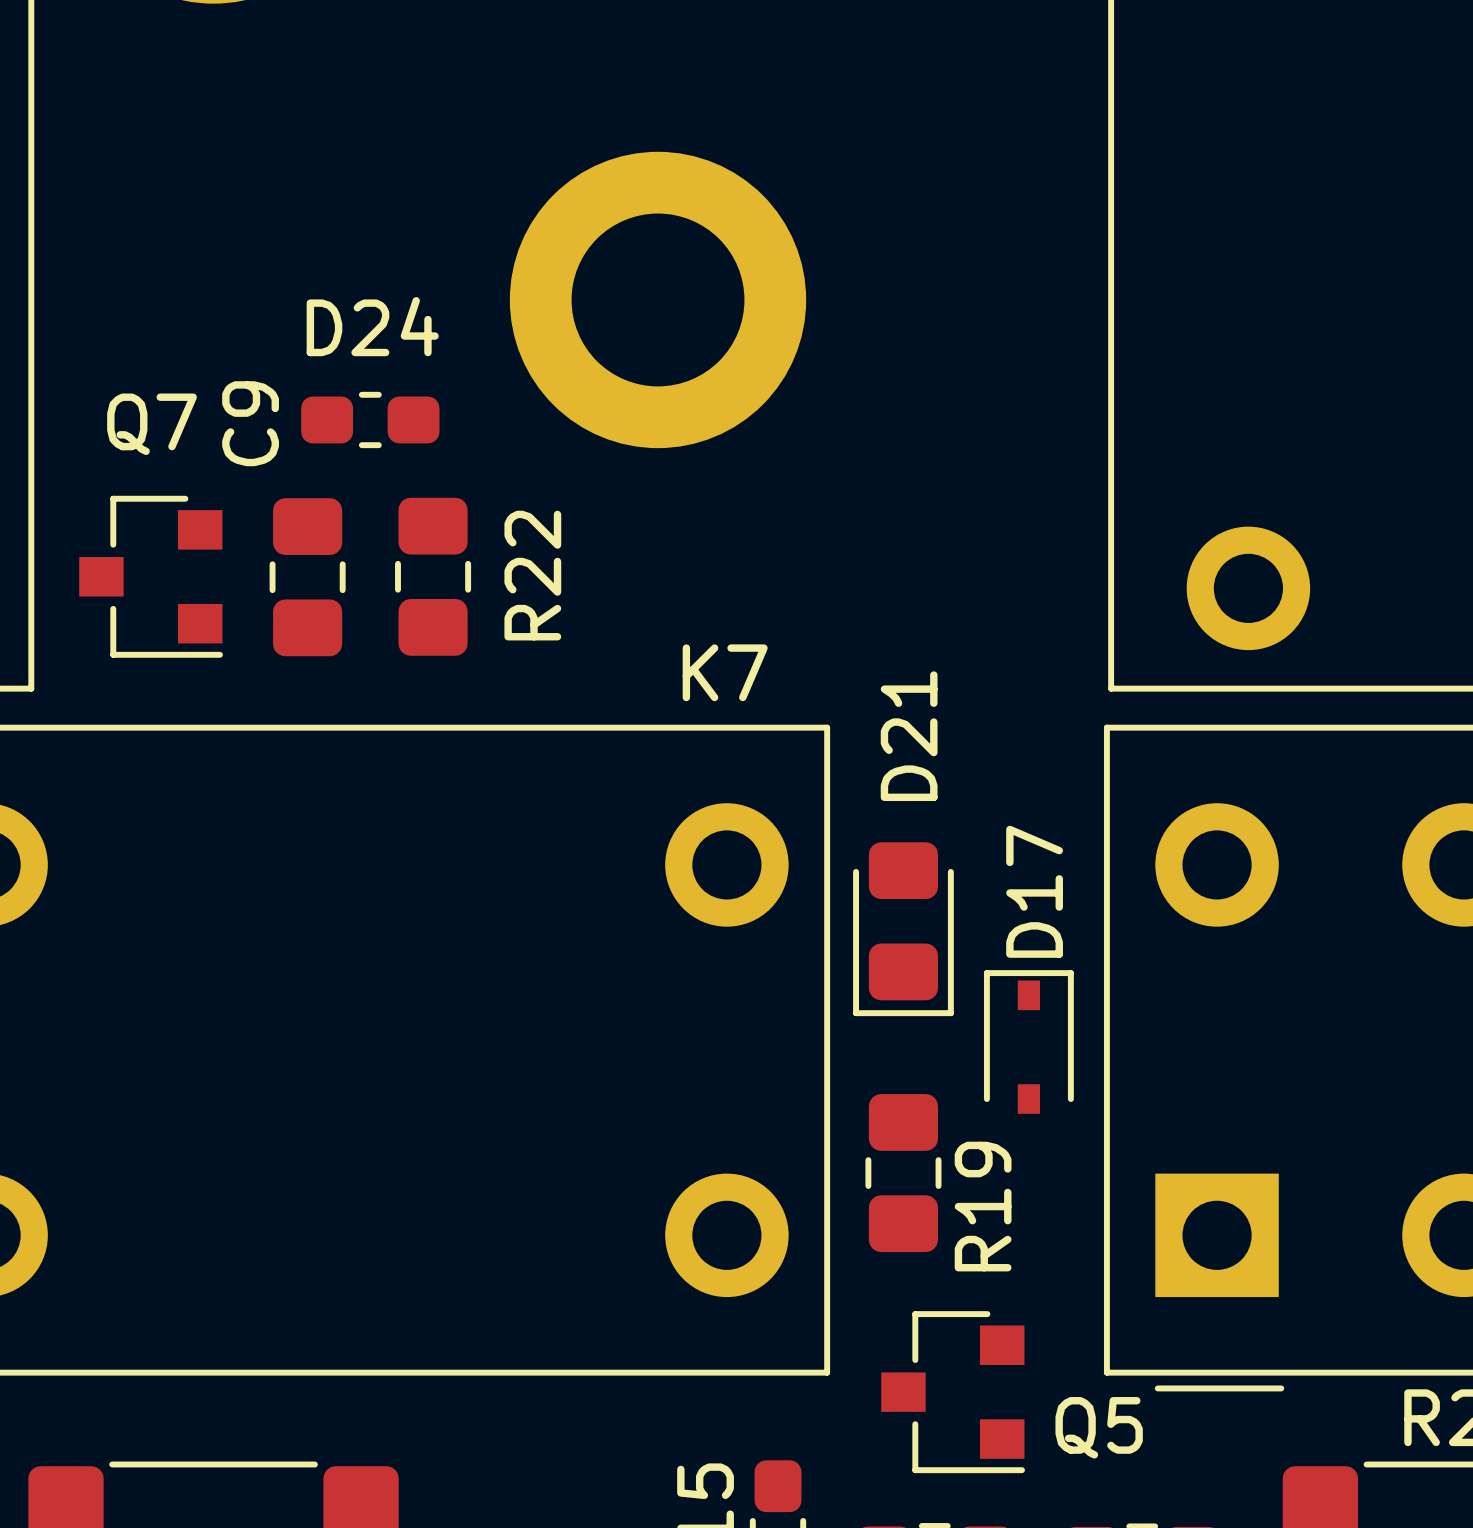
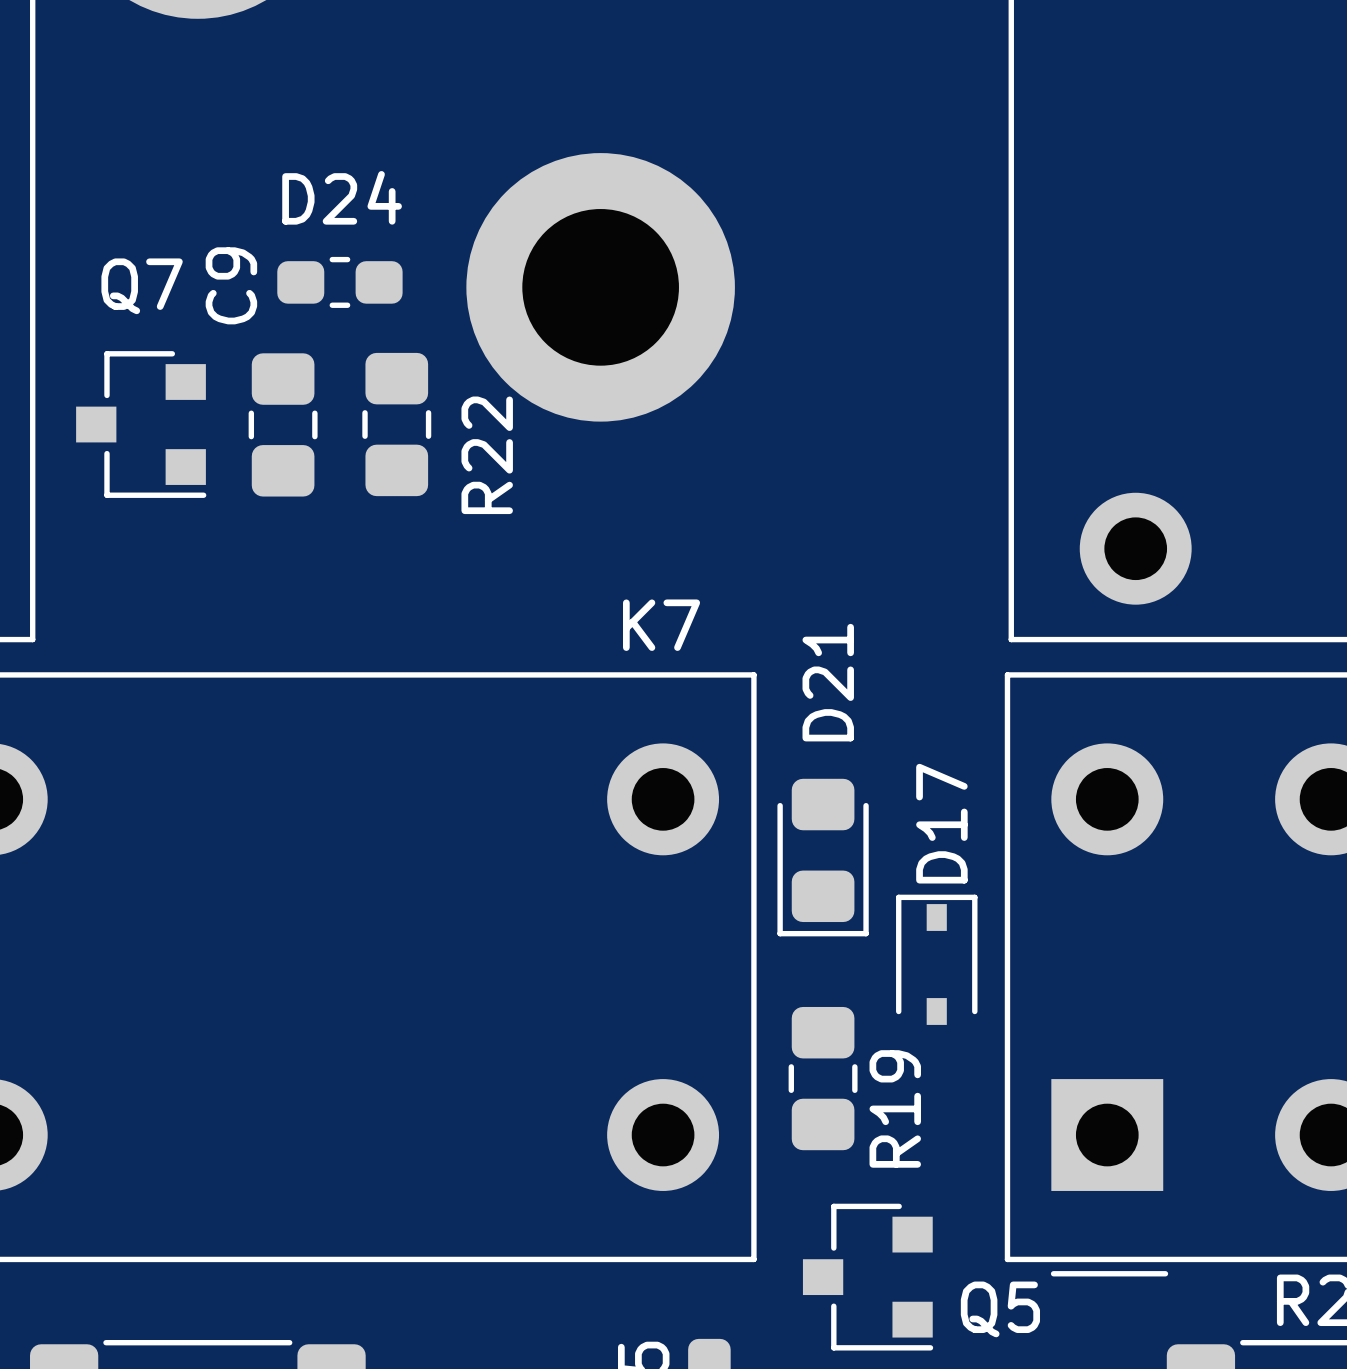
D24 position: (370, 419) -> (339, 282)
R22 name position: R22 (532, 575) -> R22 (487, 455)
Q7 position: (151, 576) -> (141, 424)
R22 position: (433, 576) -> (396, 424)
C9 position: (307, 577) -> (283, 424)

